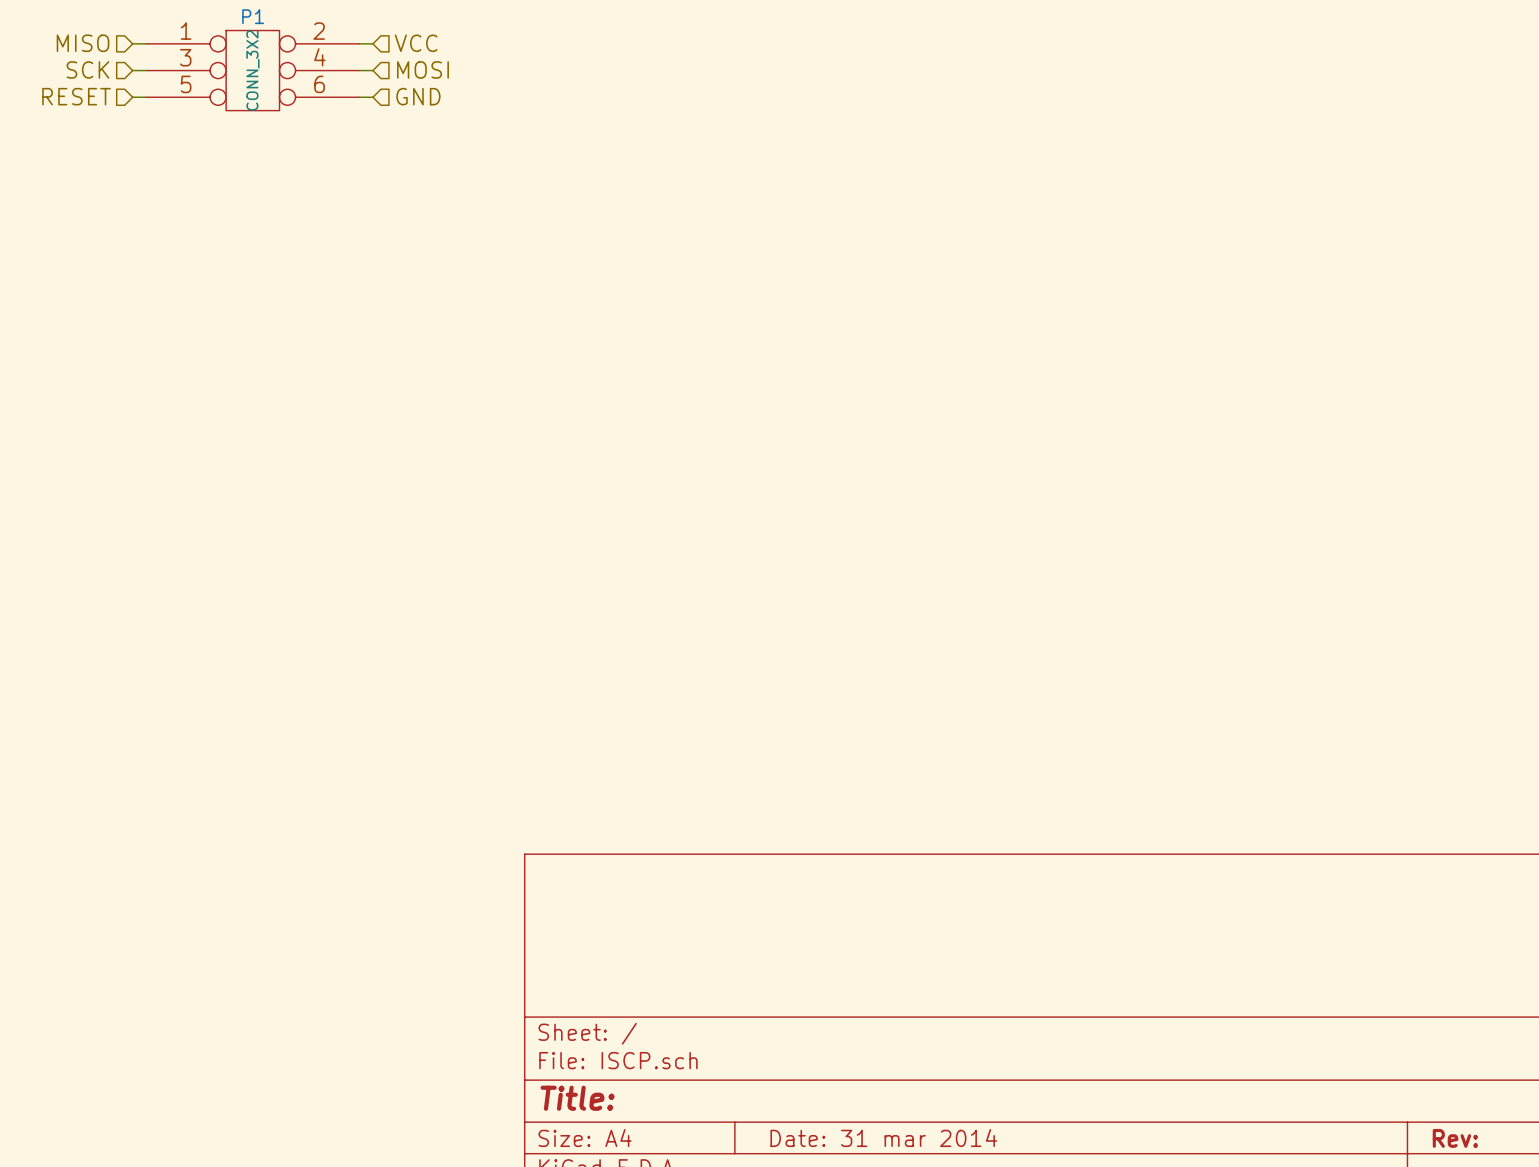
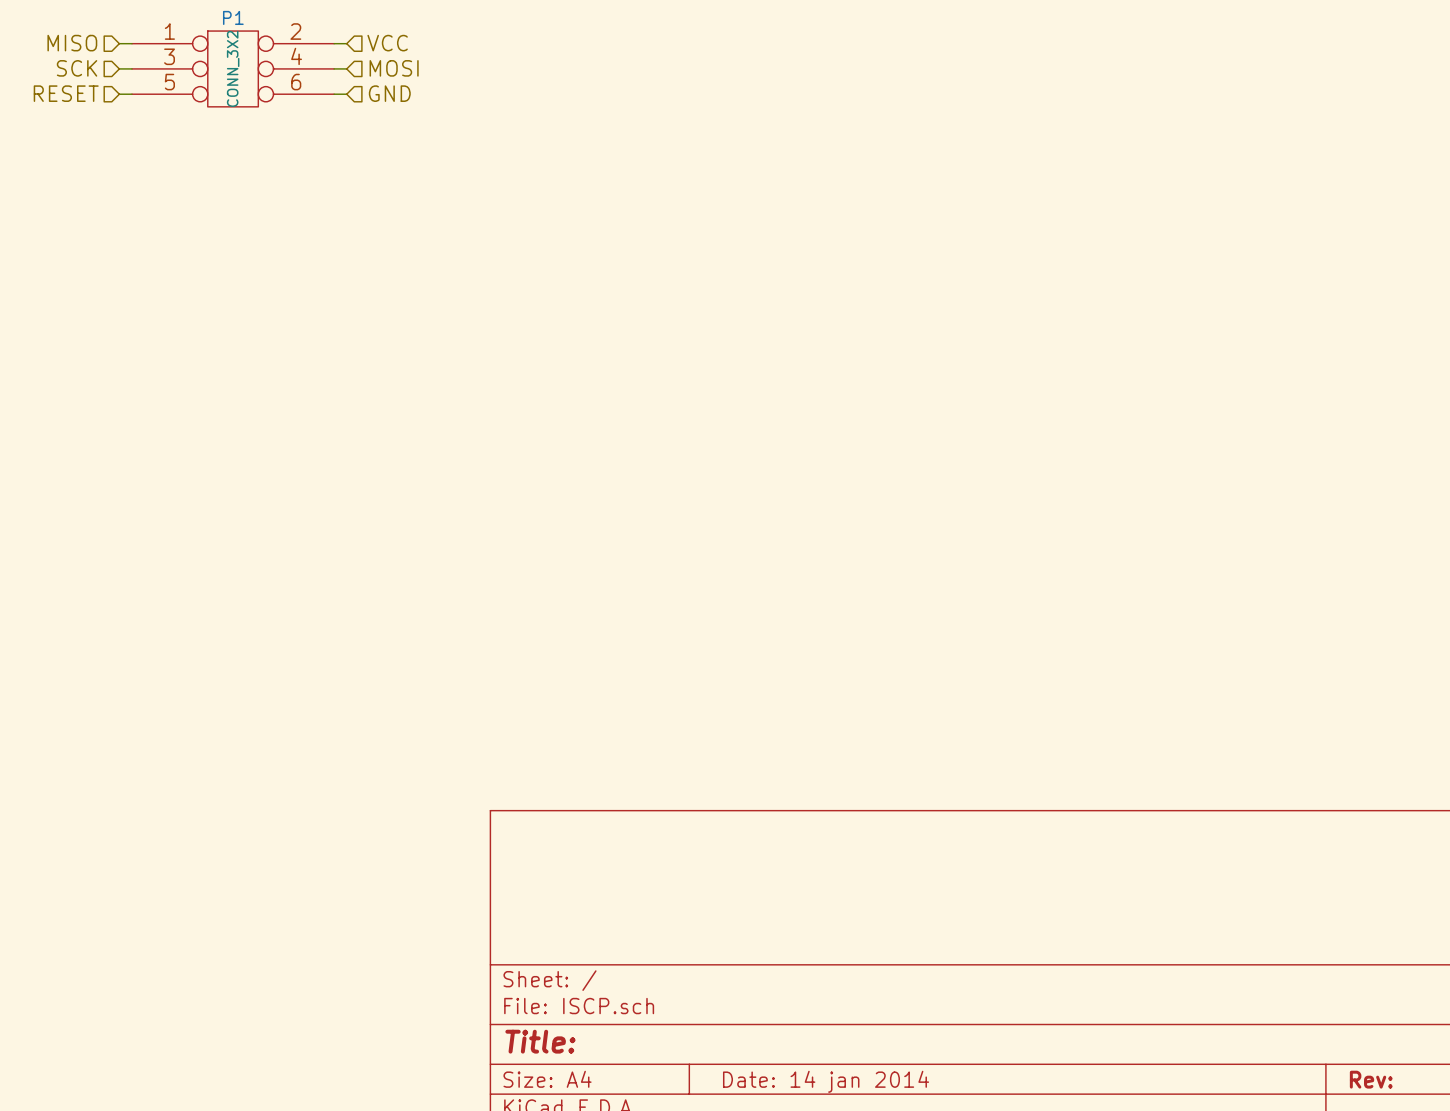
title block: Date: 31 mar 2014 (883, 1138) -> Date: 14 jan 2014 (826, 1081)

